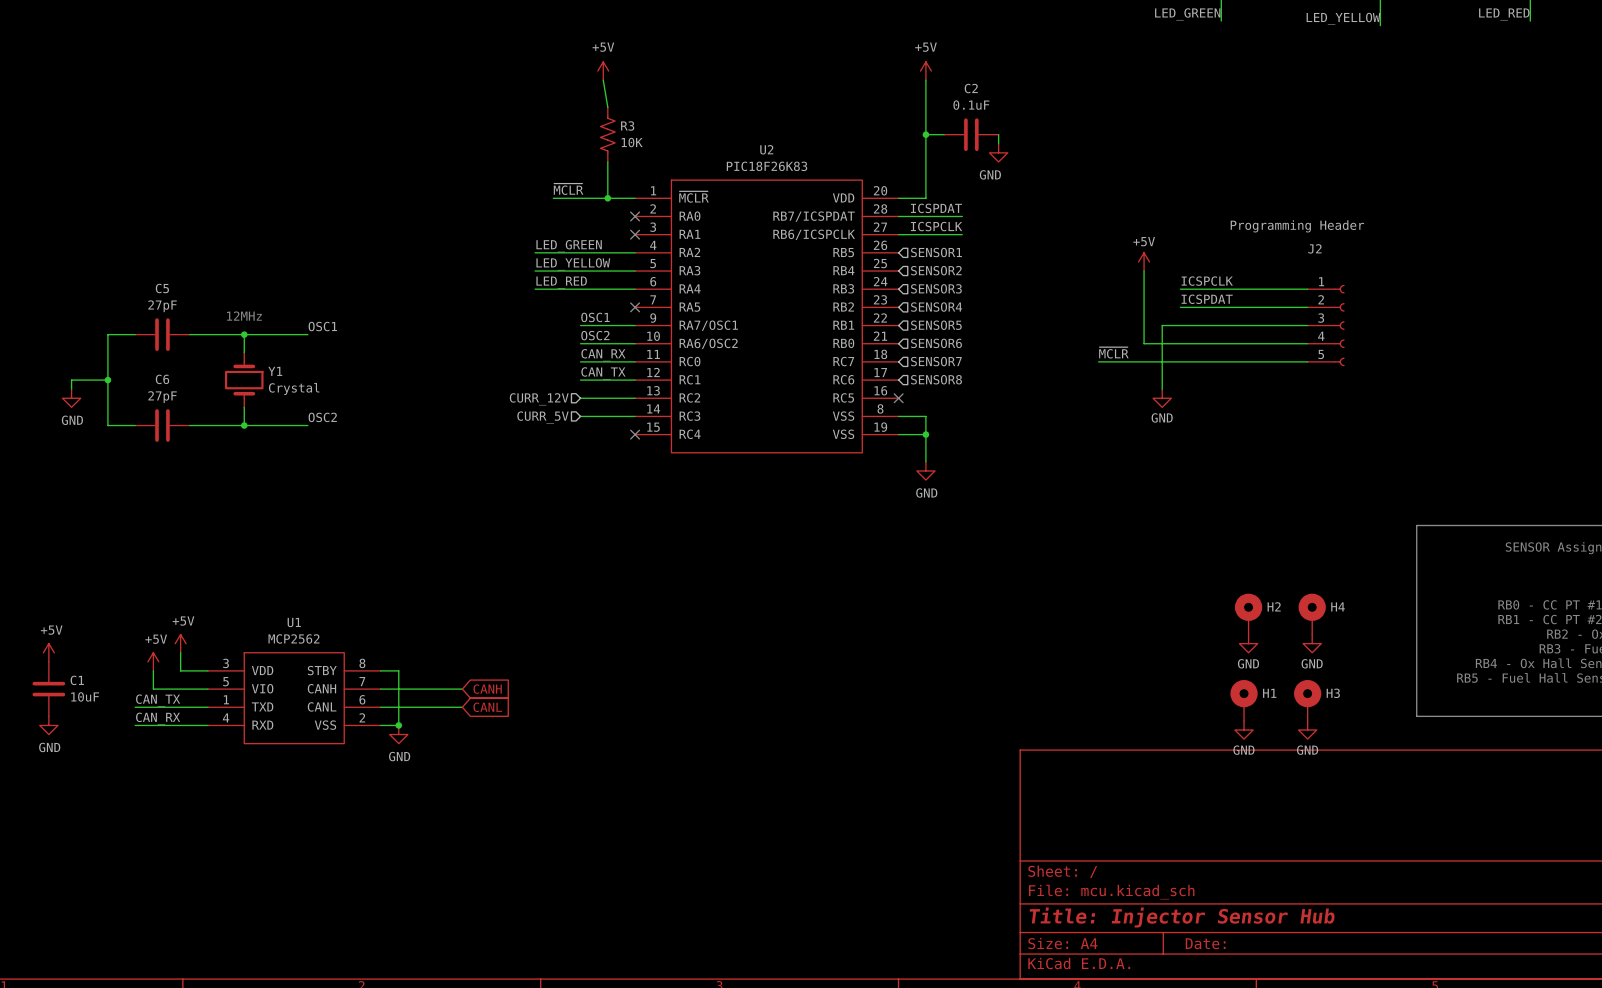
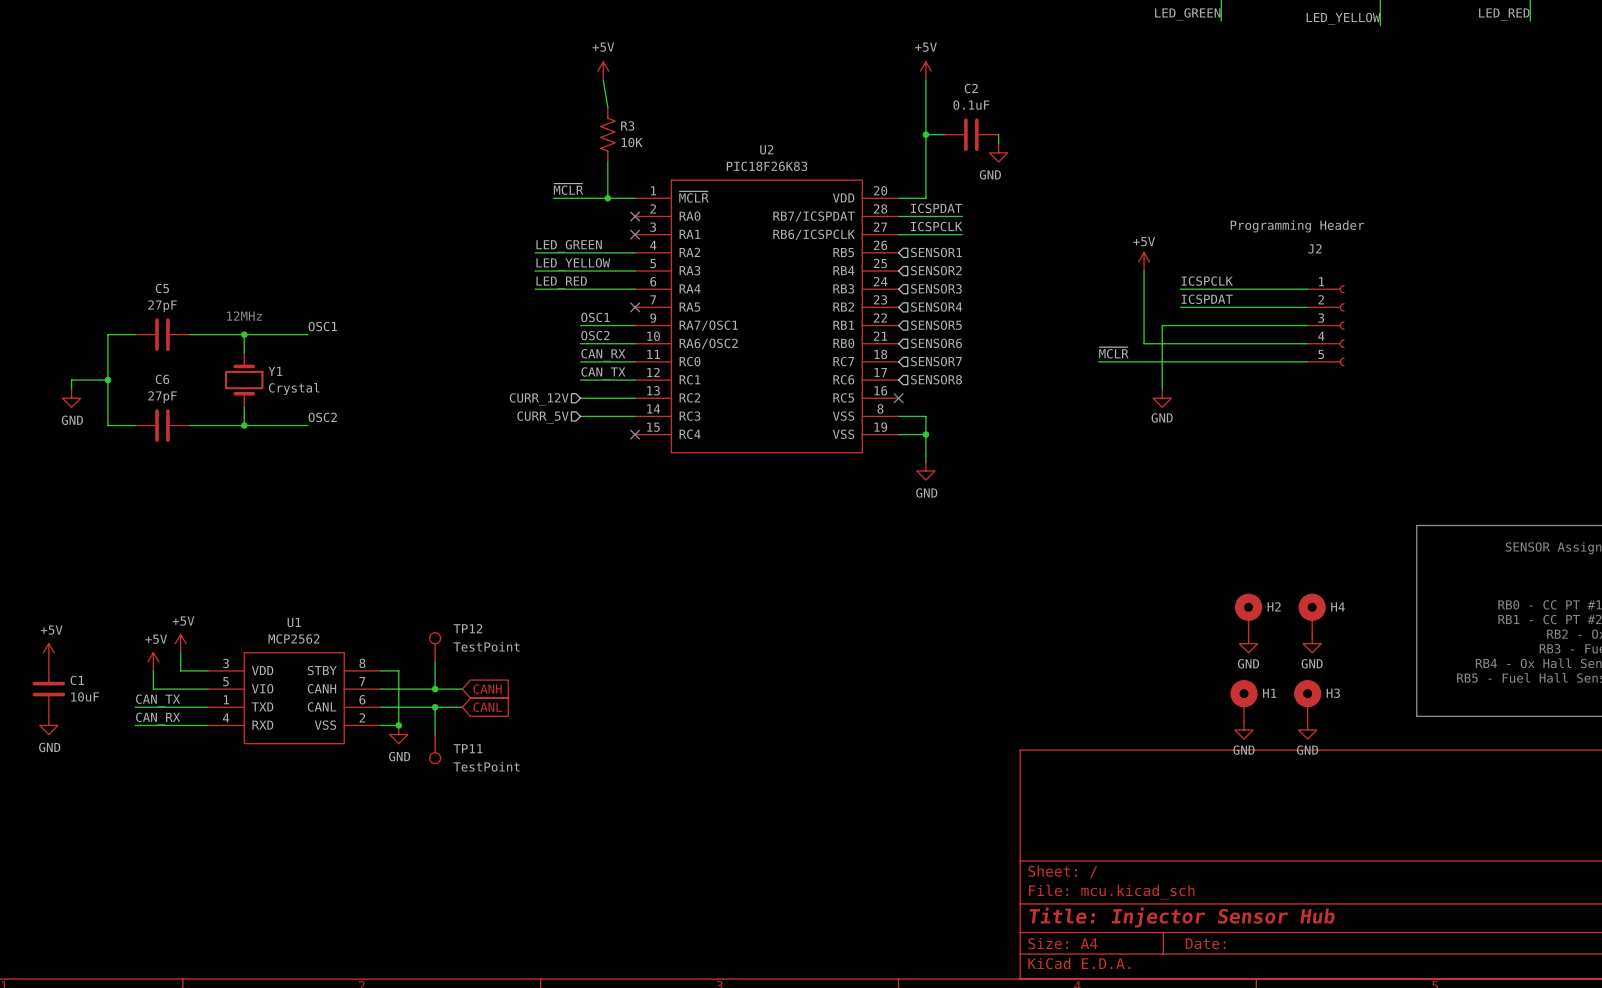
TP12: none -> TestPoint (435, 647)
wire: none -> (435, 661) (435, 689)
junction: none -> (435, 689)
wire: none -> (435, 707) (435, 734)
junction: none -> (435, 707)
TP11: none -> TestPoint (435, 749)

